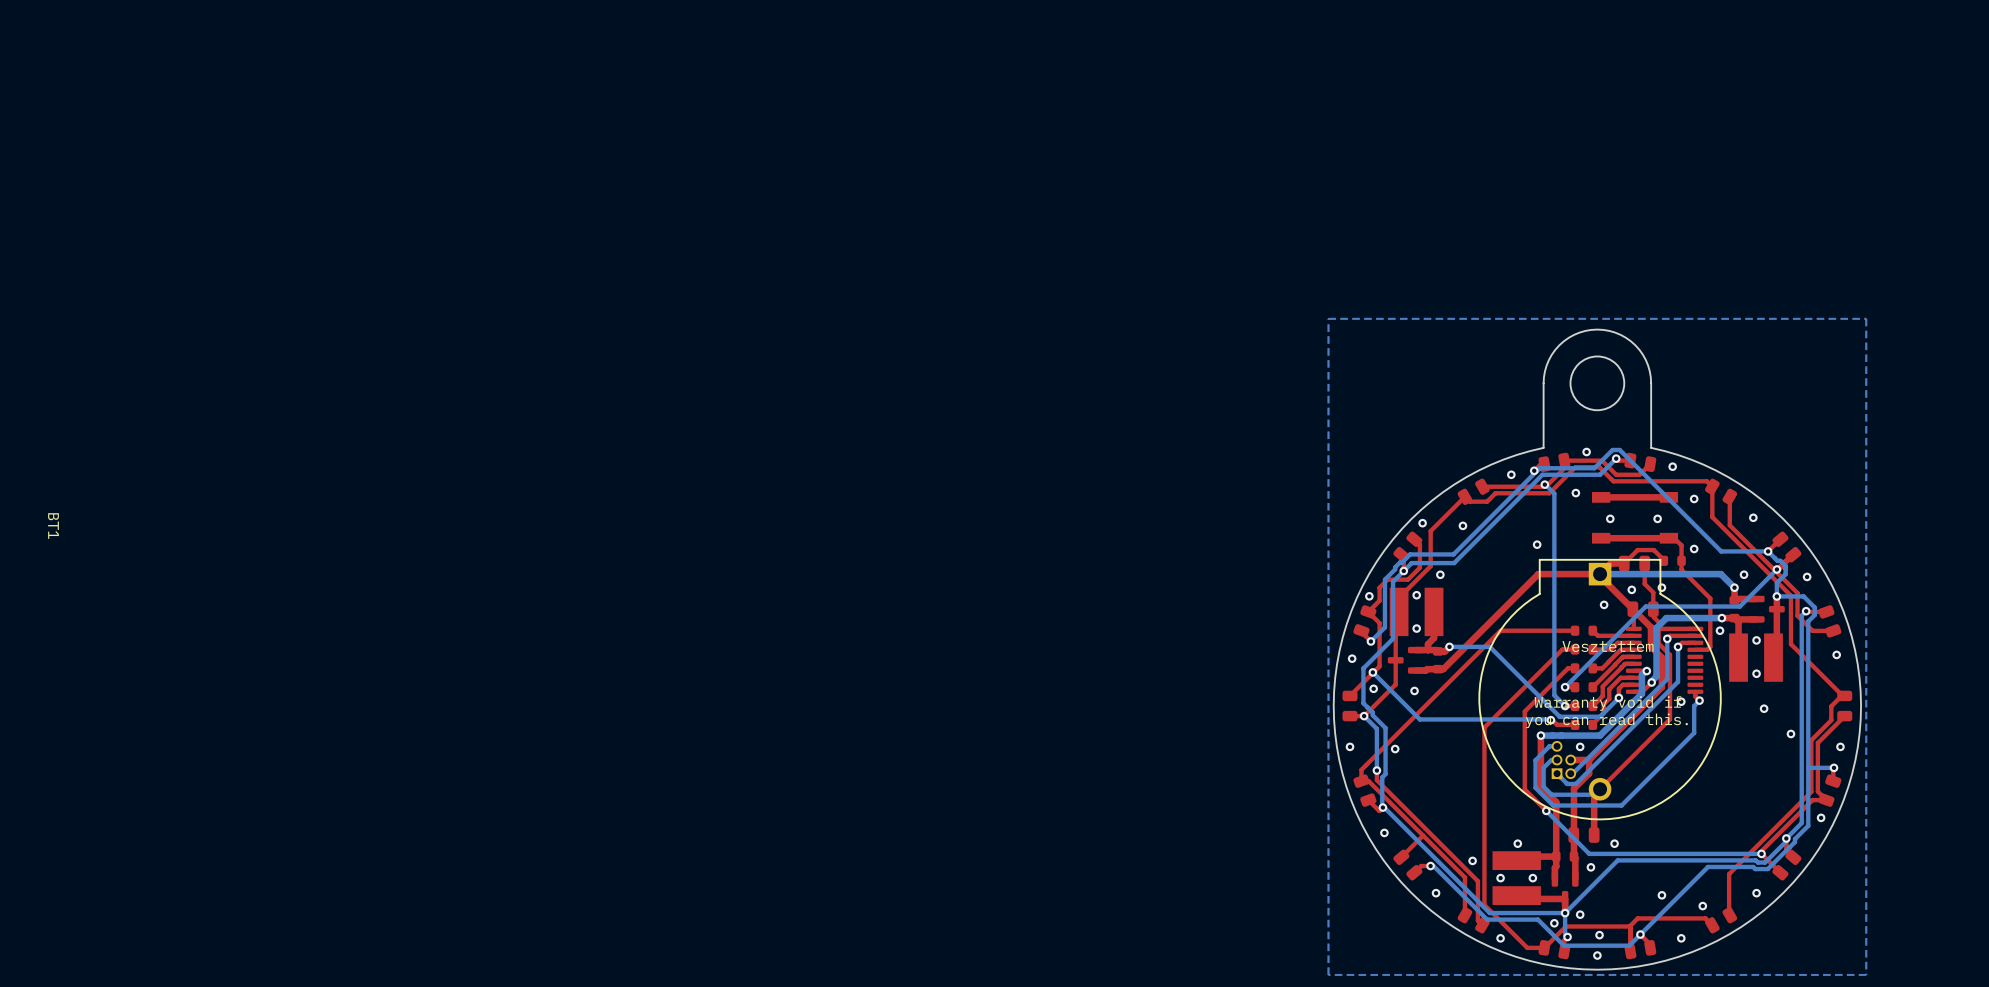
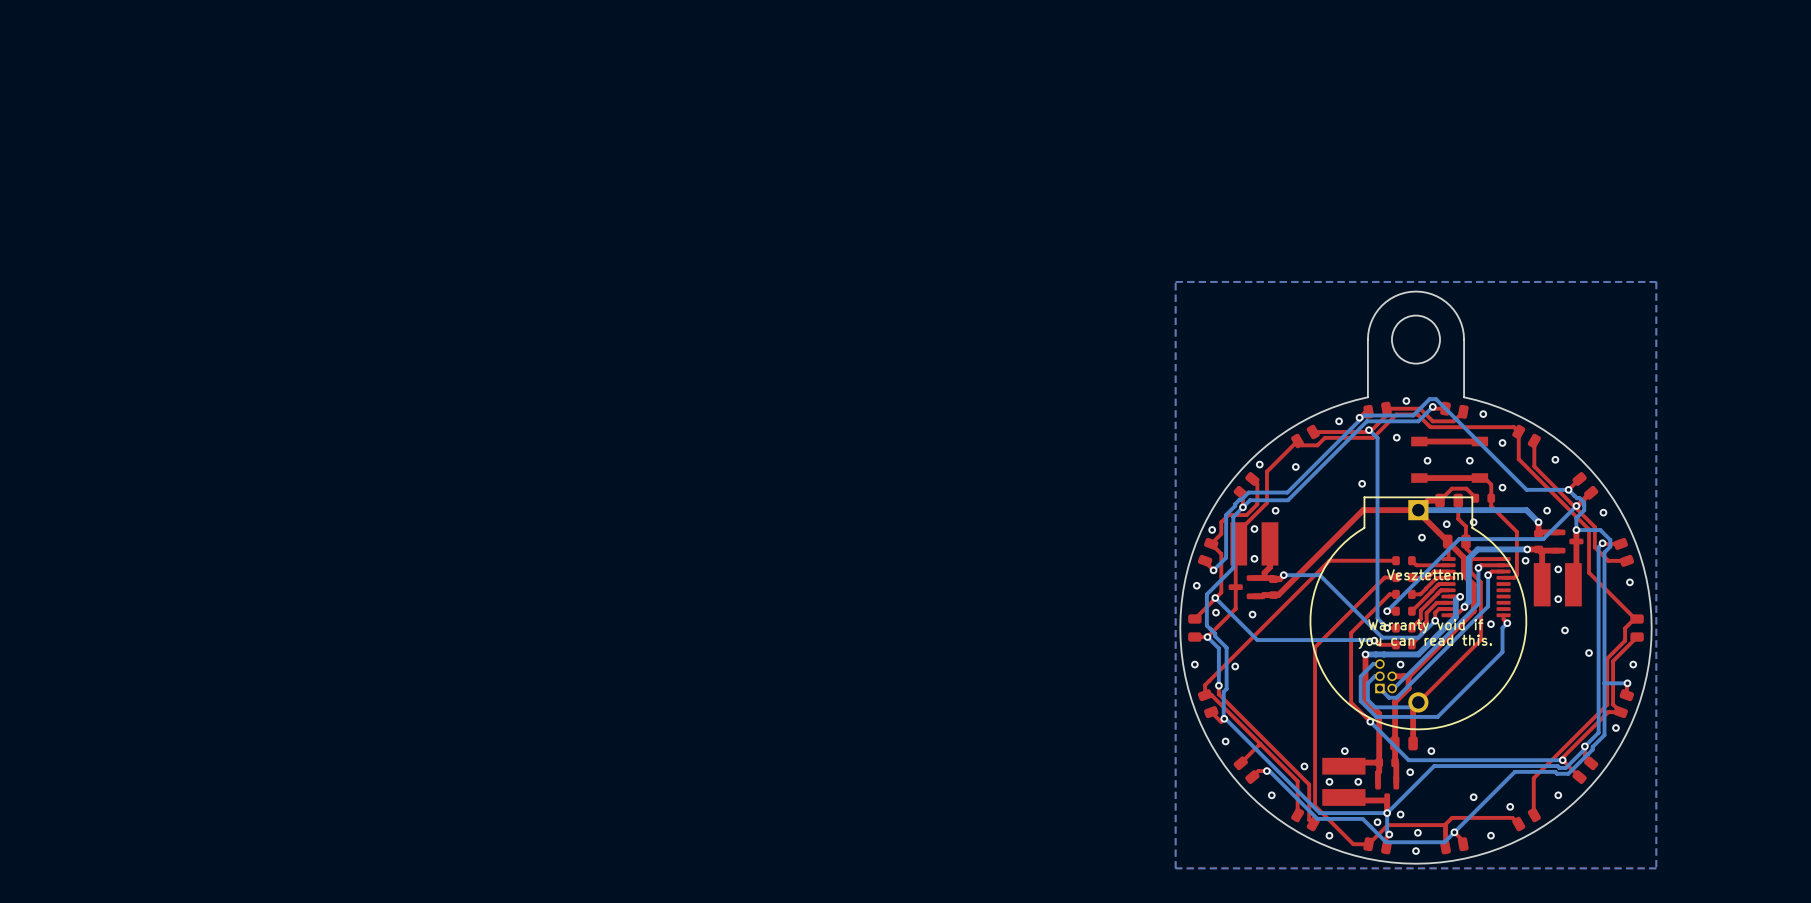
BT1 name: BT1 (53, 526) -> none

